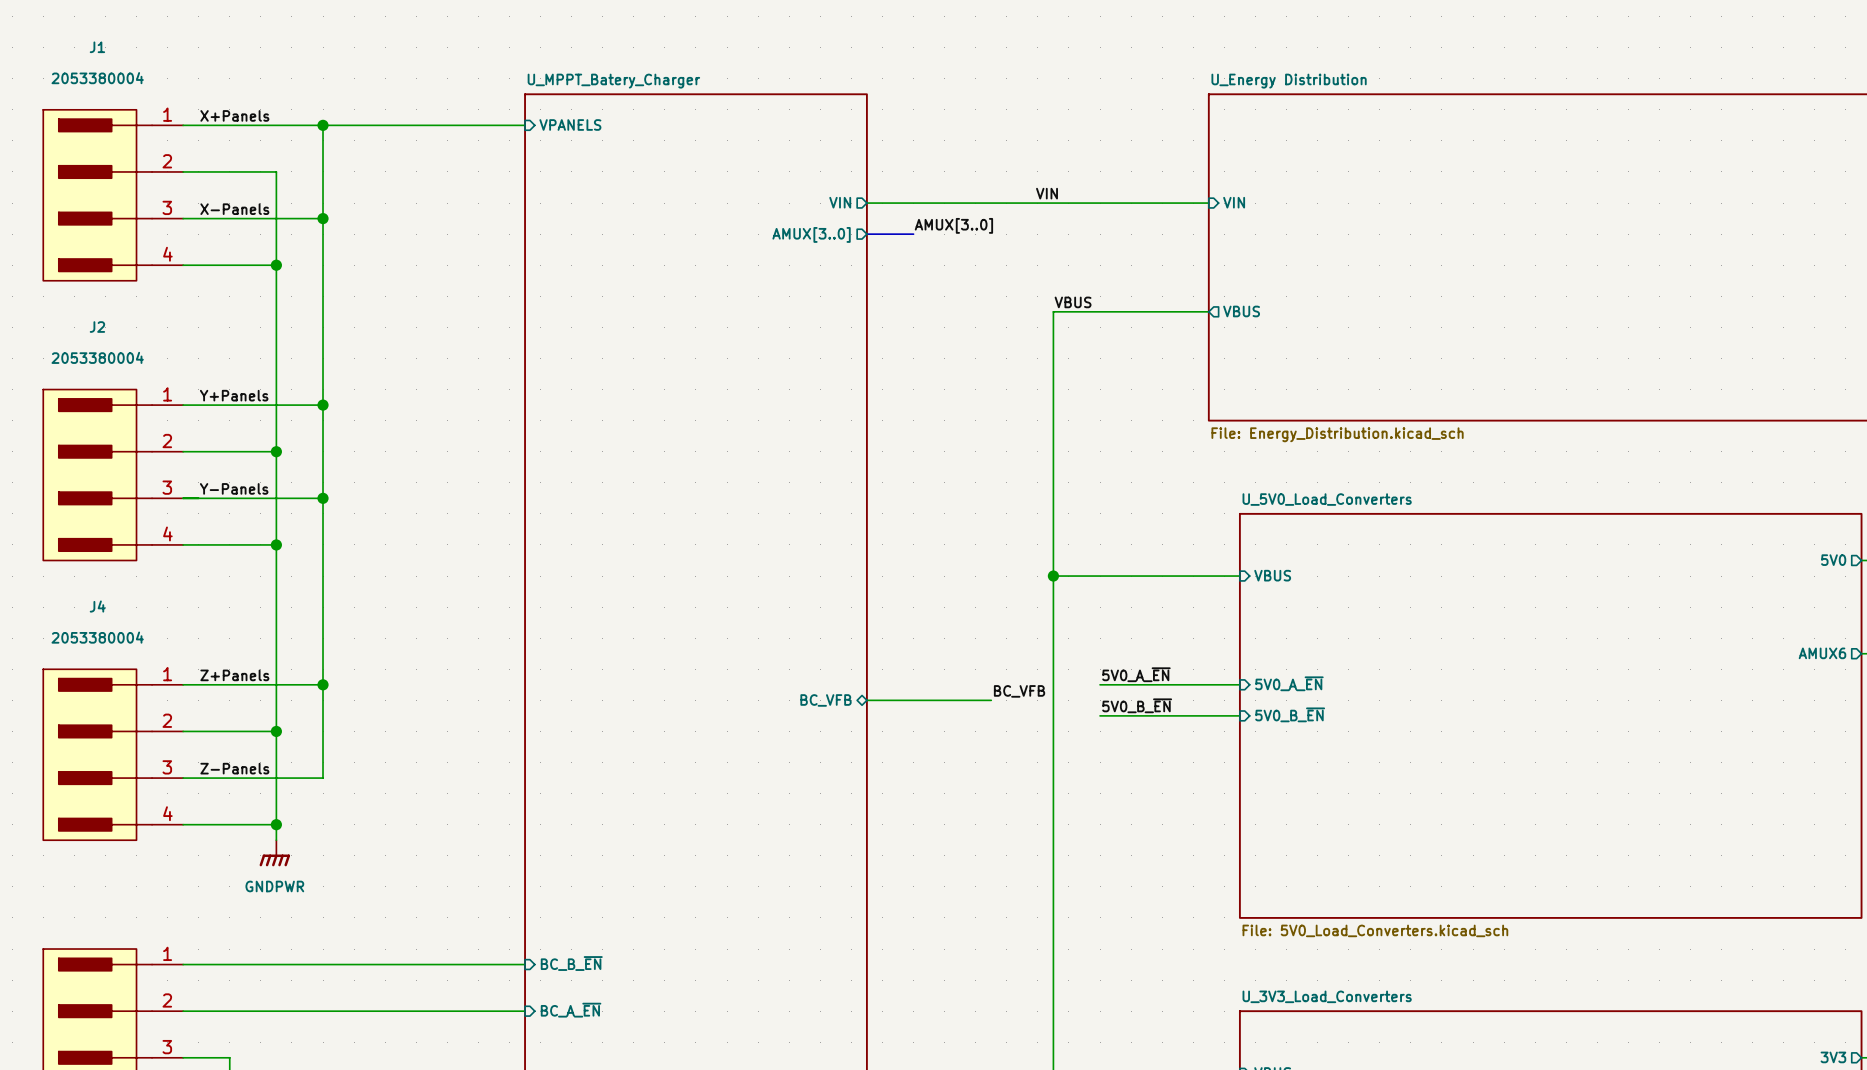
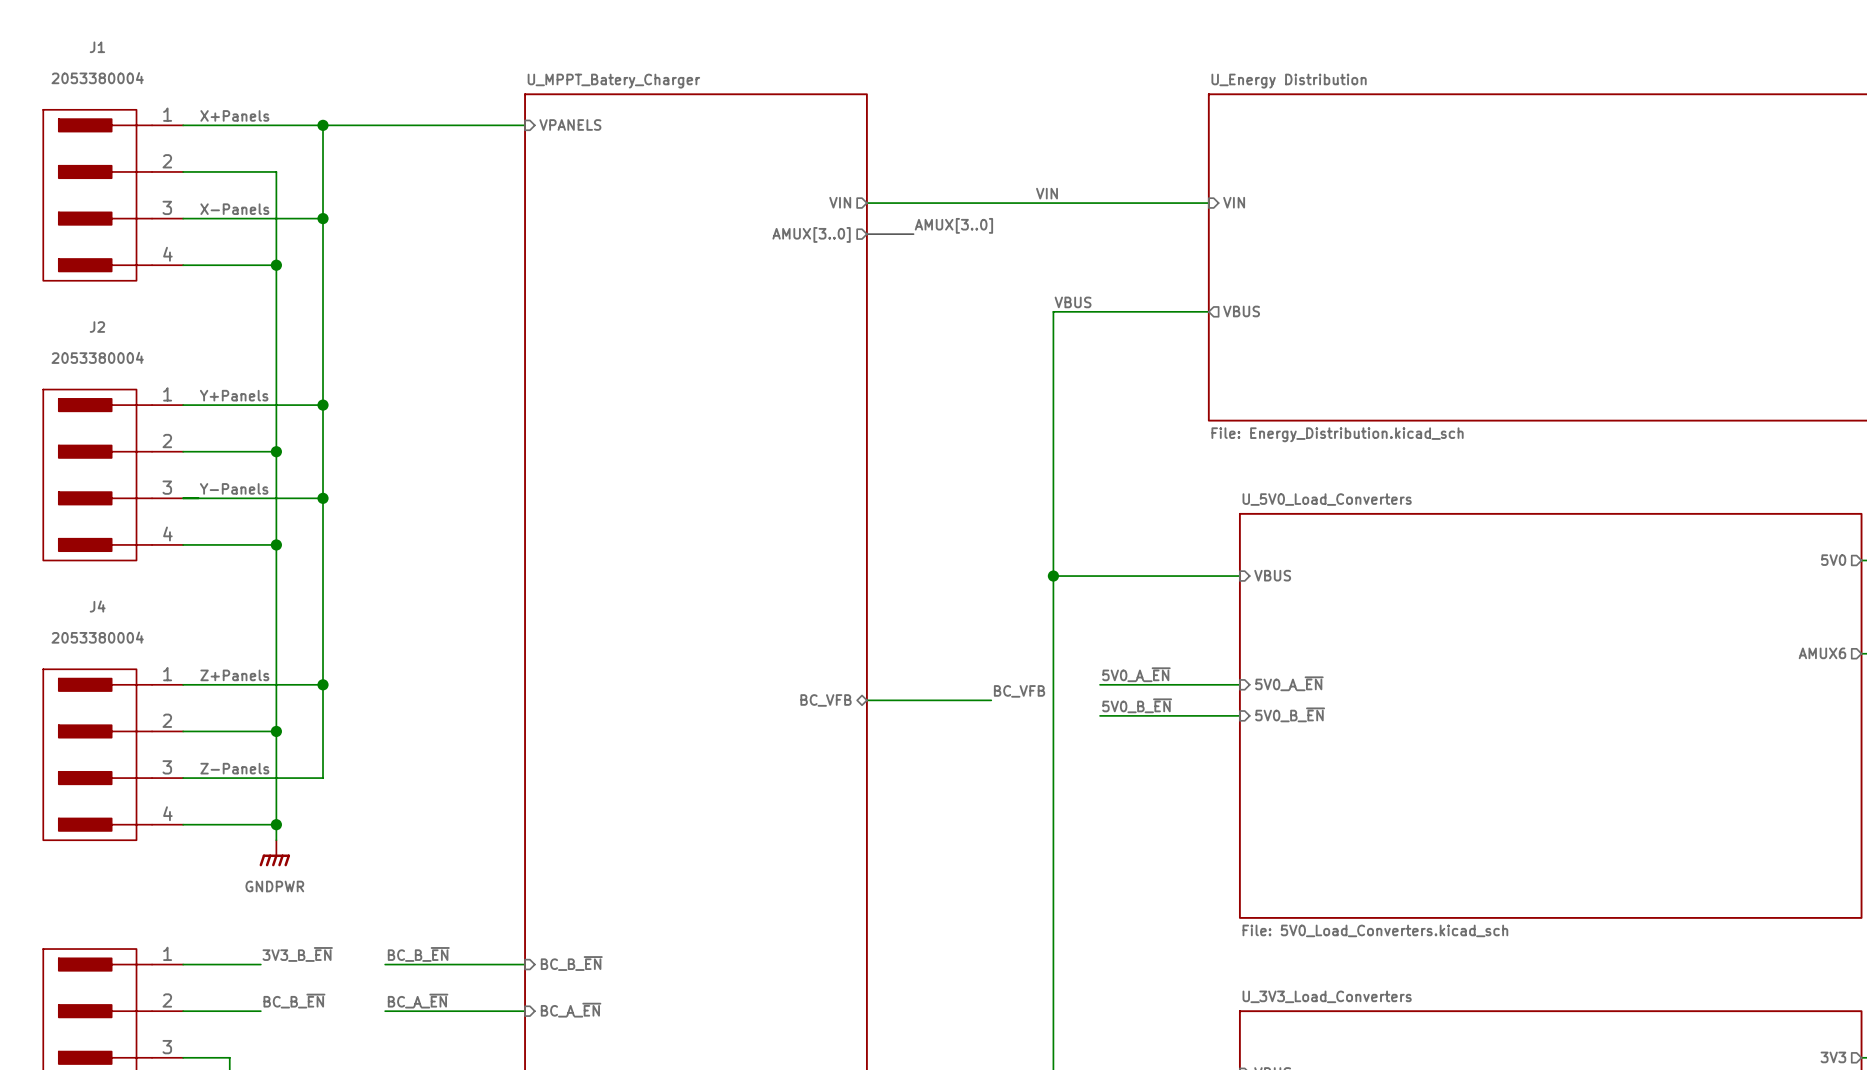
label: none -> 3V3_B_~{EN} (297, 954)
label: none -> BC_B_~{EN} (418, 954)
wire: (260, 964) (385, 964) -> none
label: none -> BC_B_~{EN} (294, 1001)
label: none -> BC_A_~{EN} (418, 1001)
wire: (260, 1011) (385, 1011) -> none

